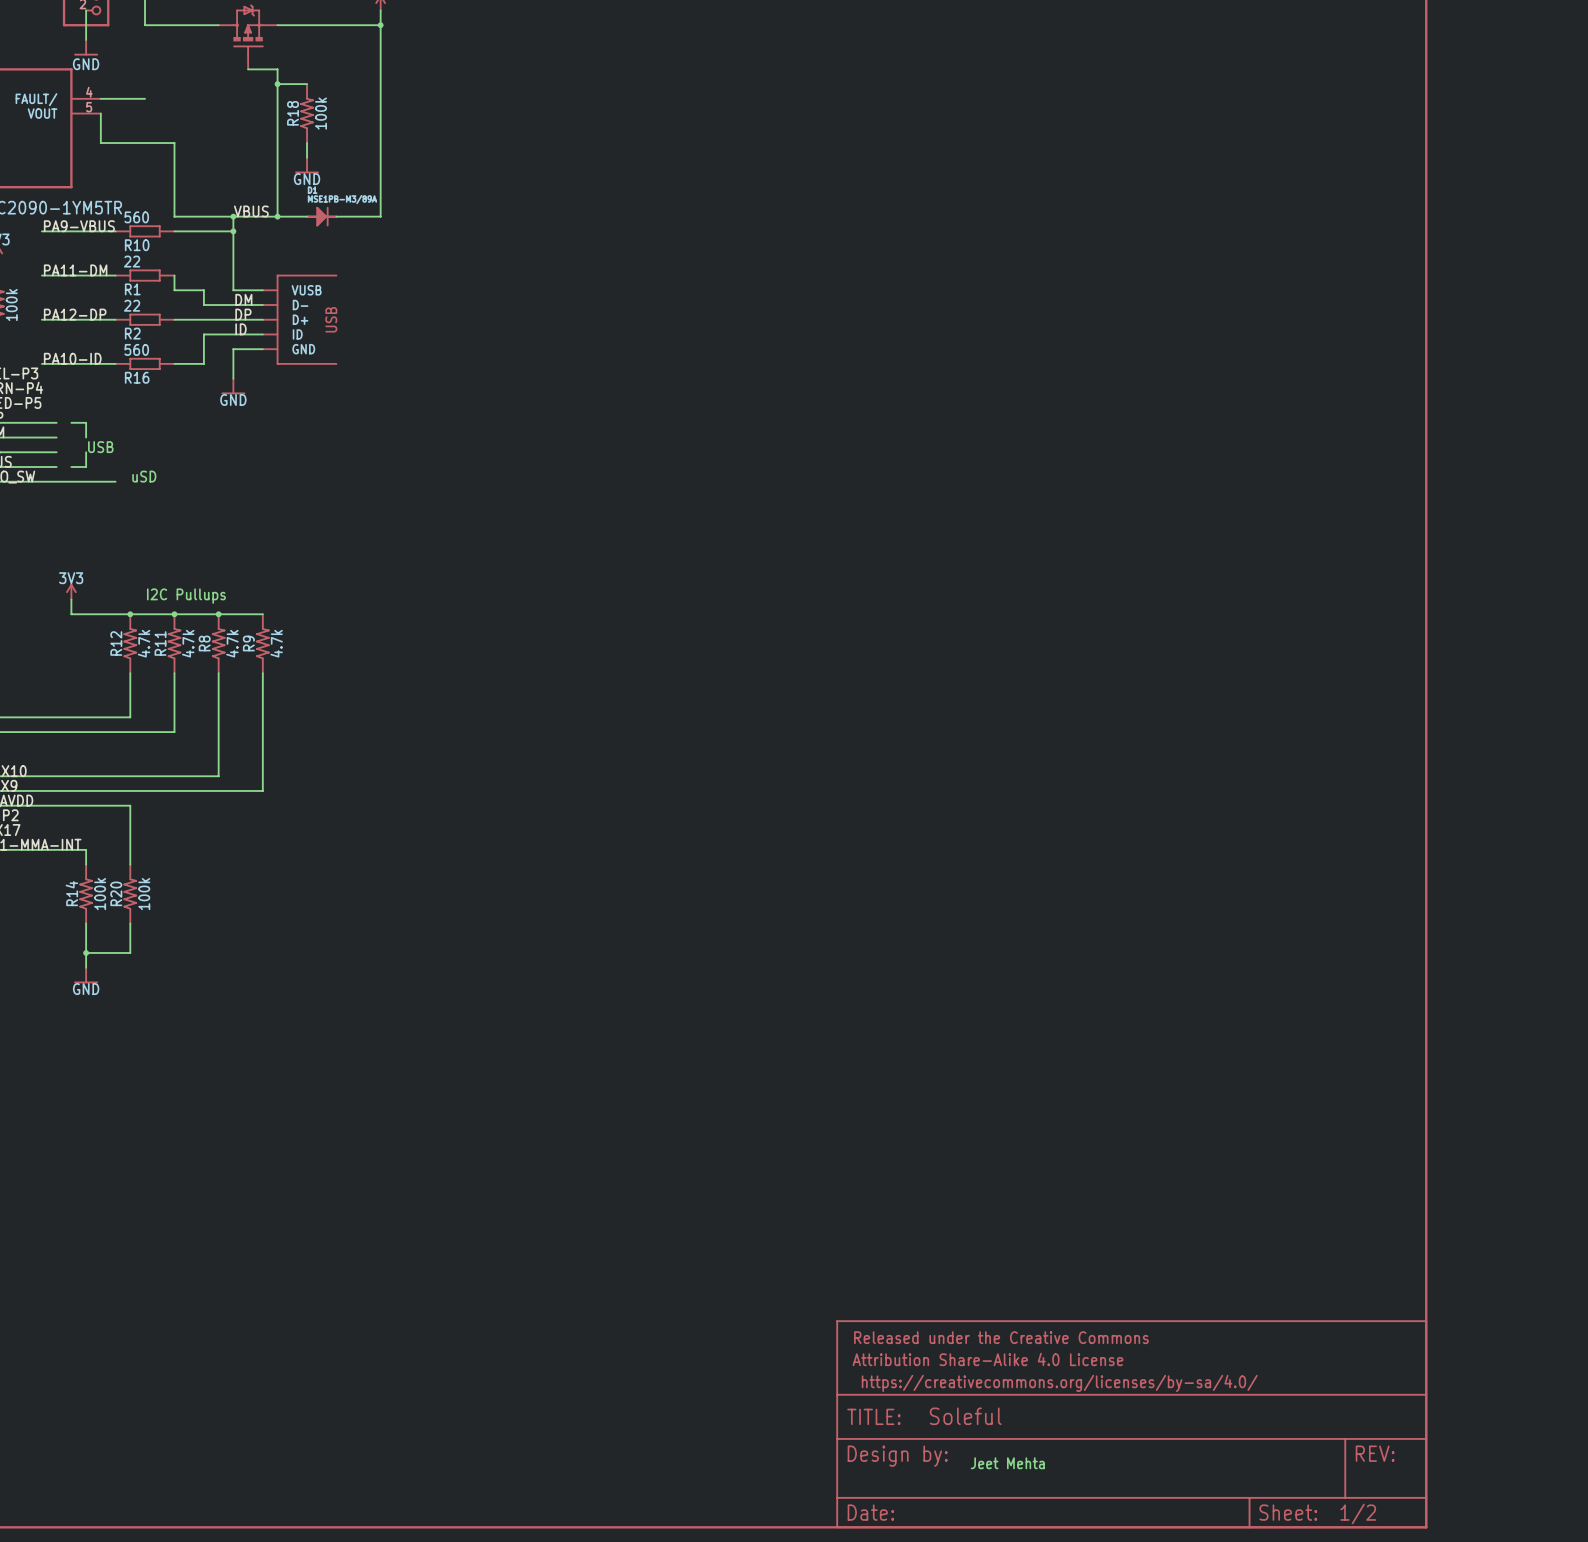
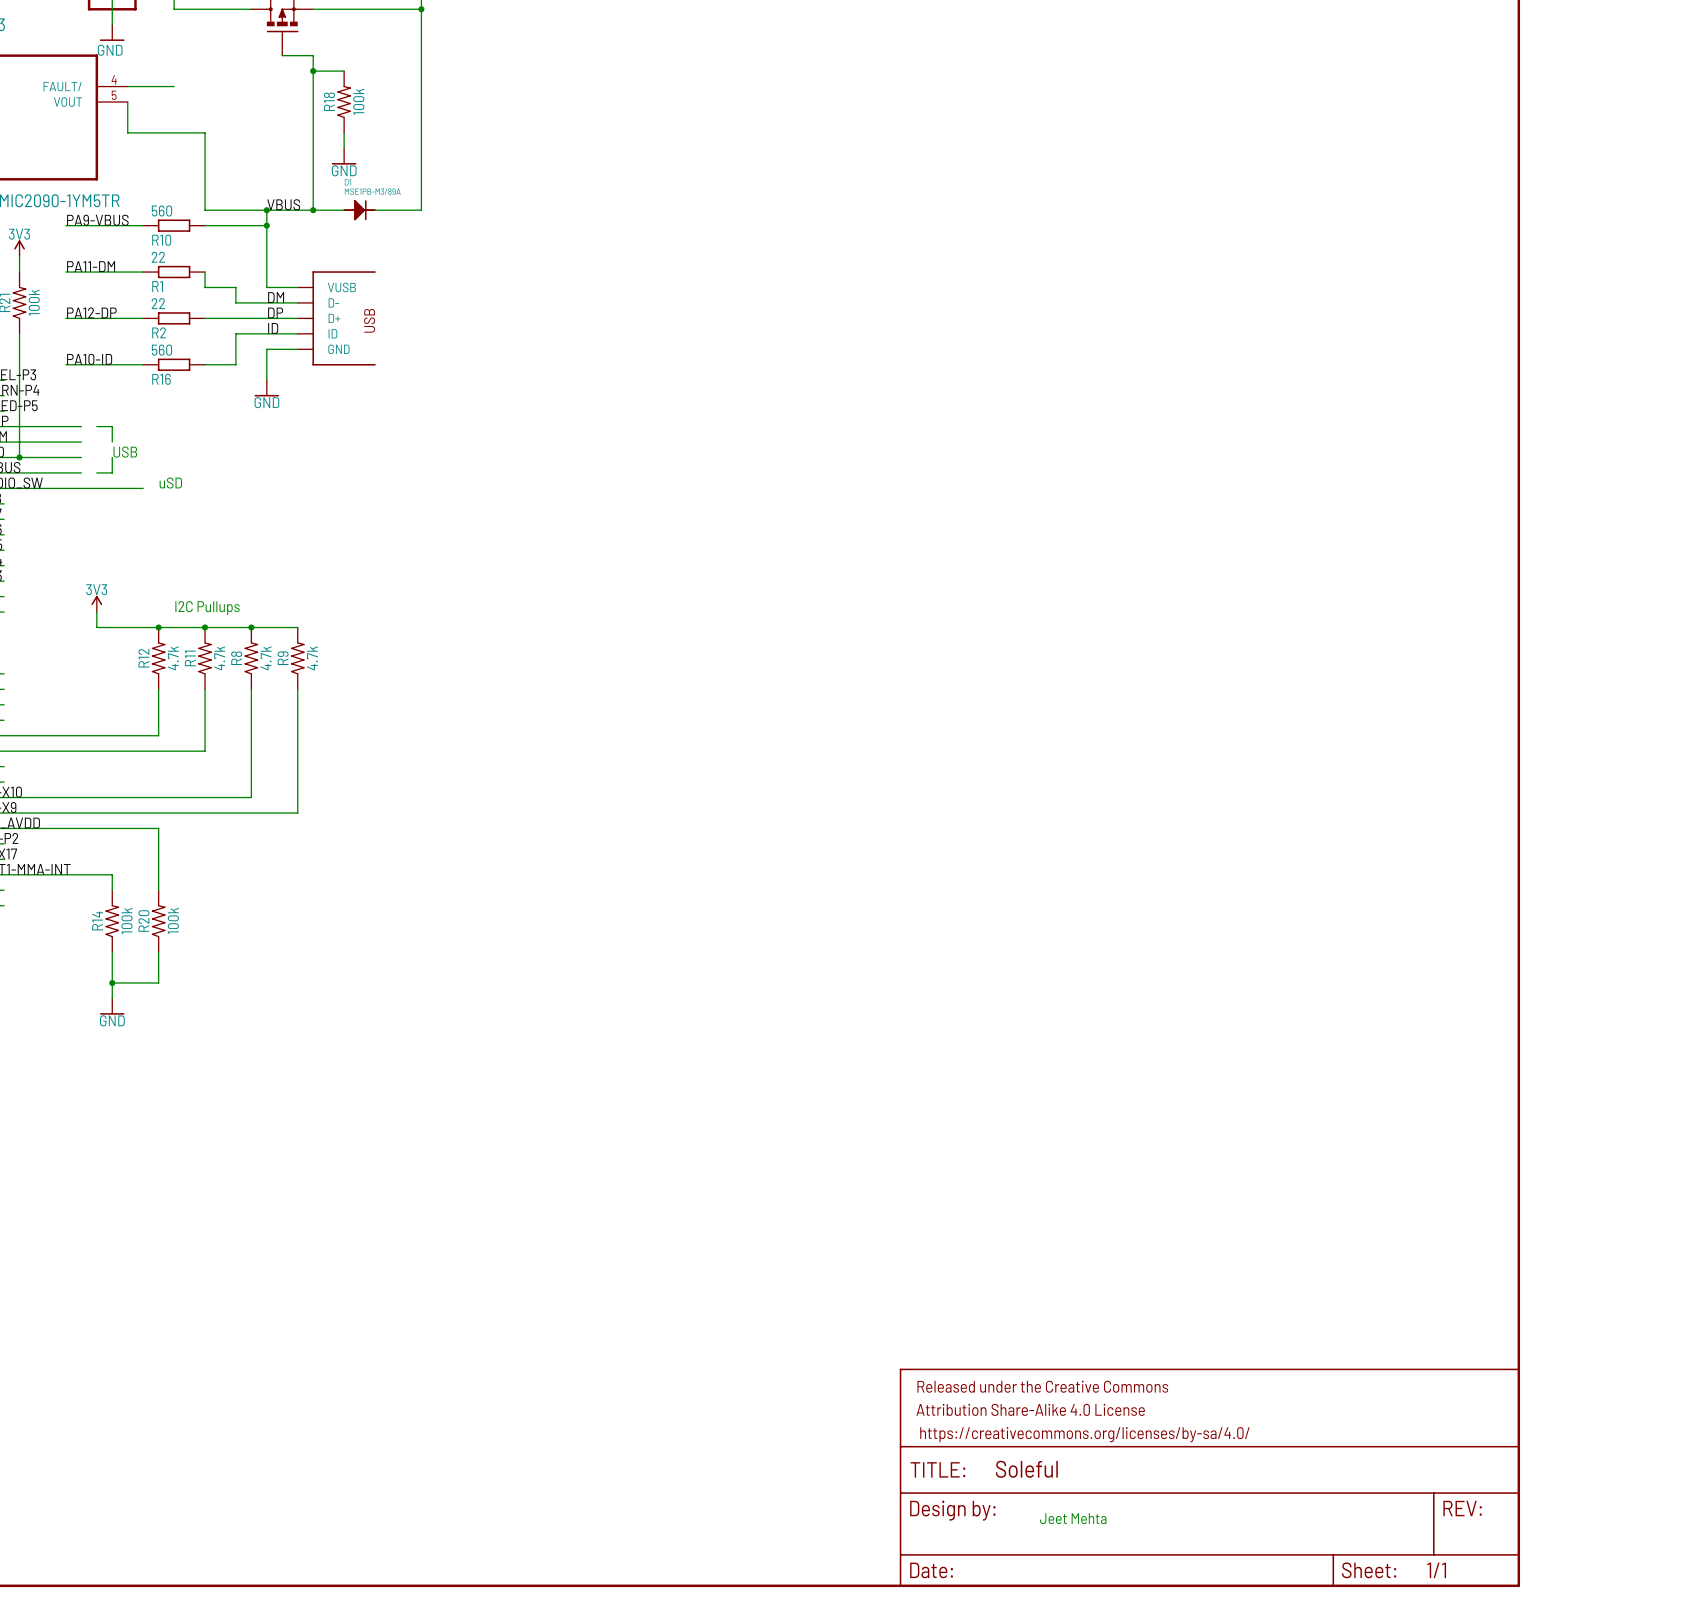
part text: 1/2 (1358, 1514) -> 1/1 (1436, 1570)

